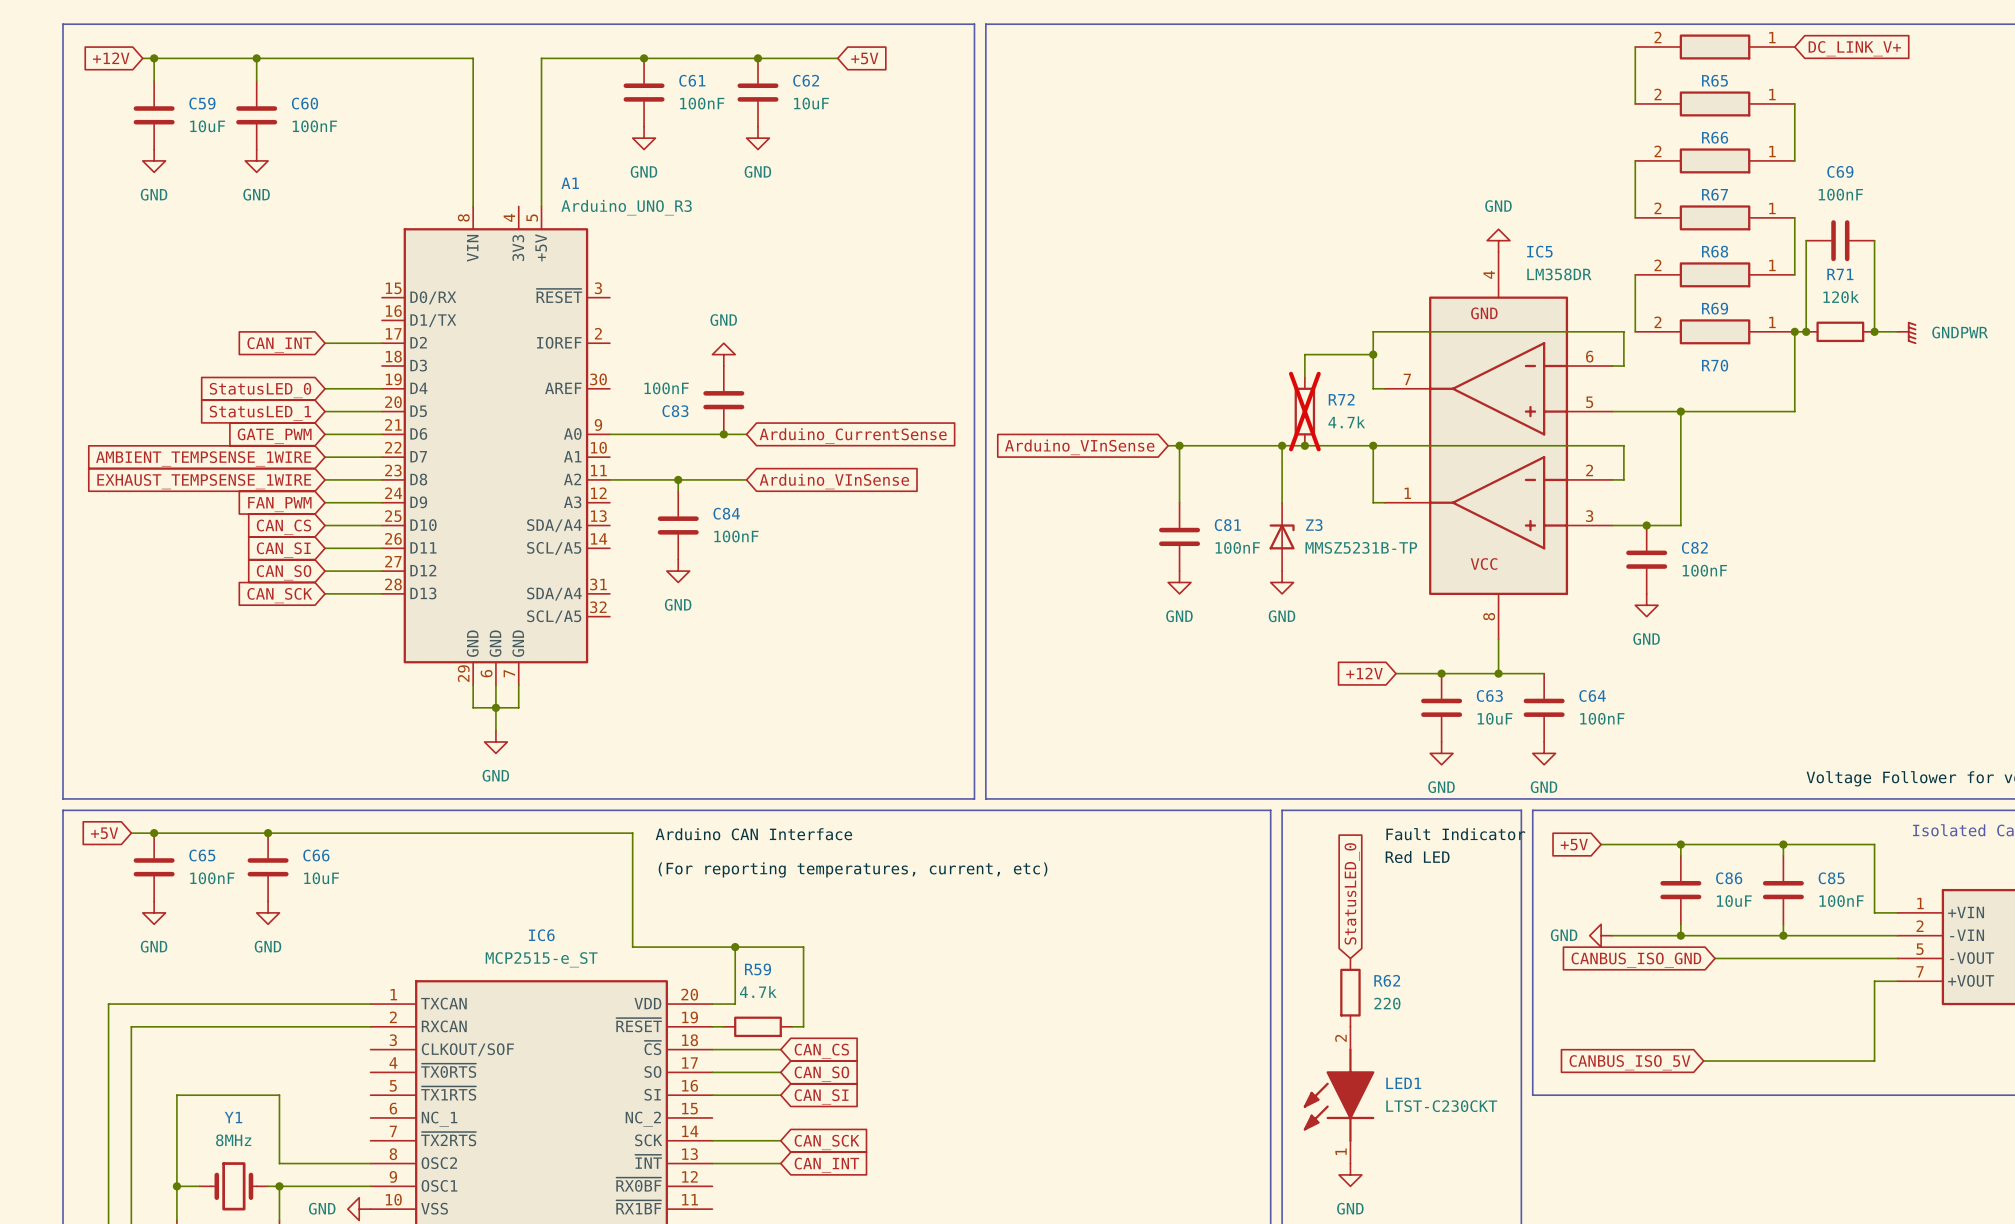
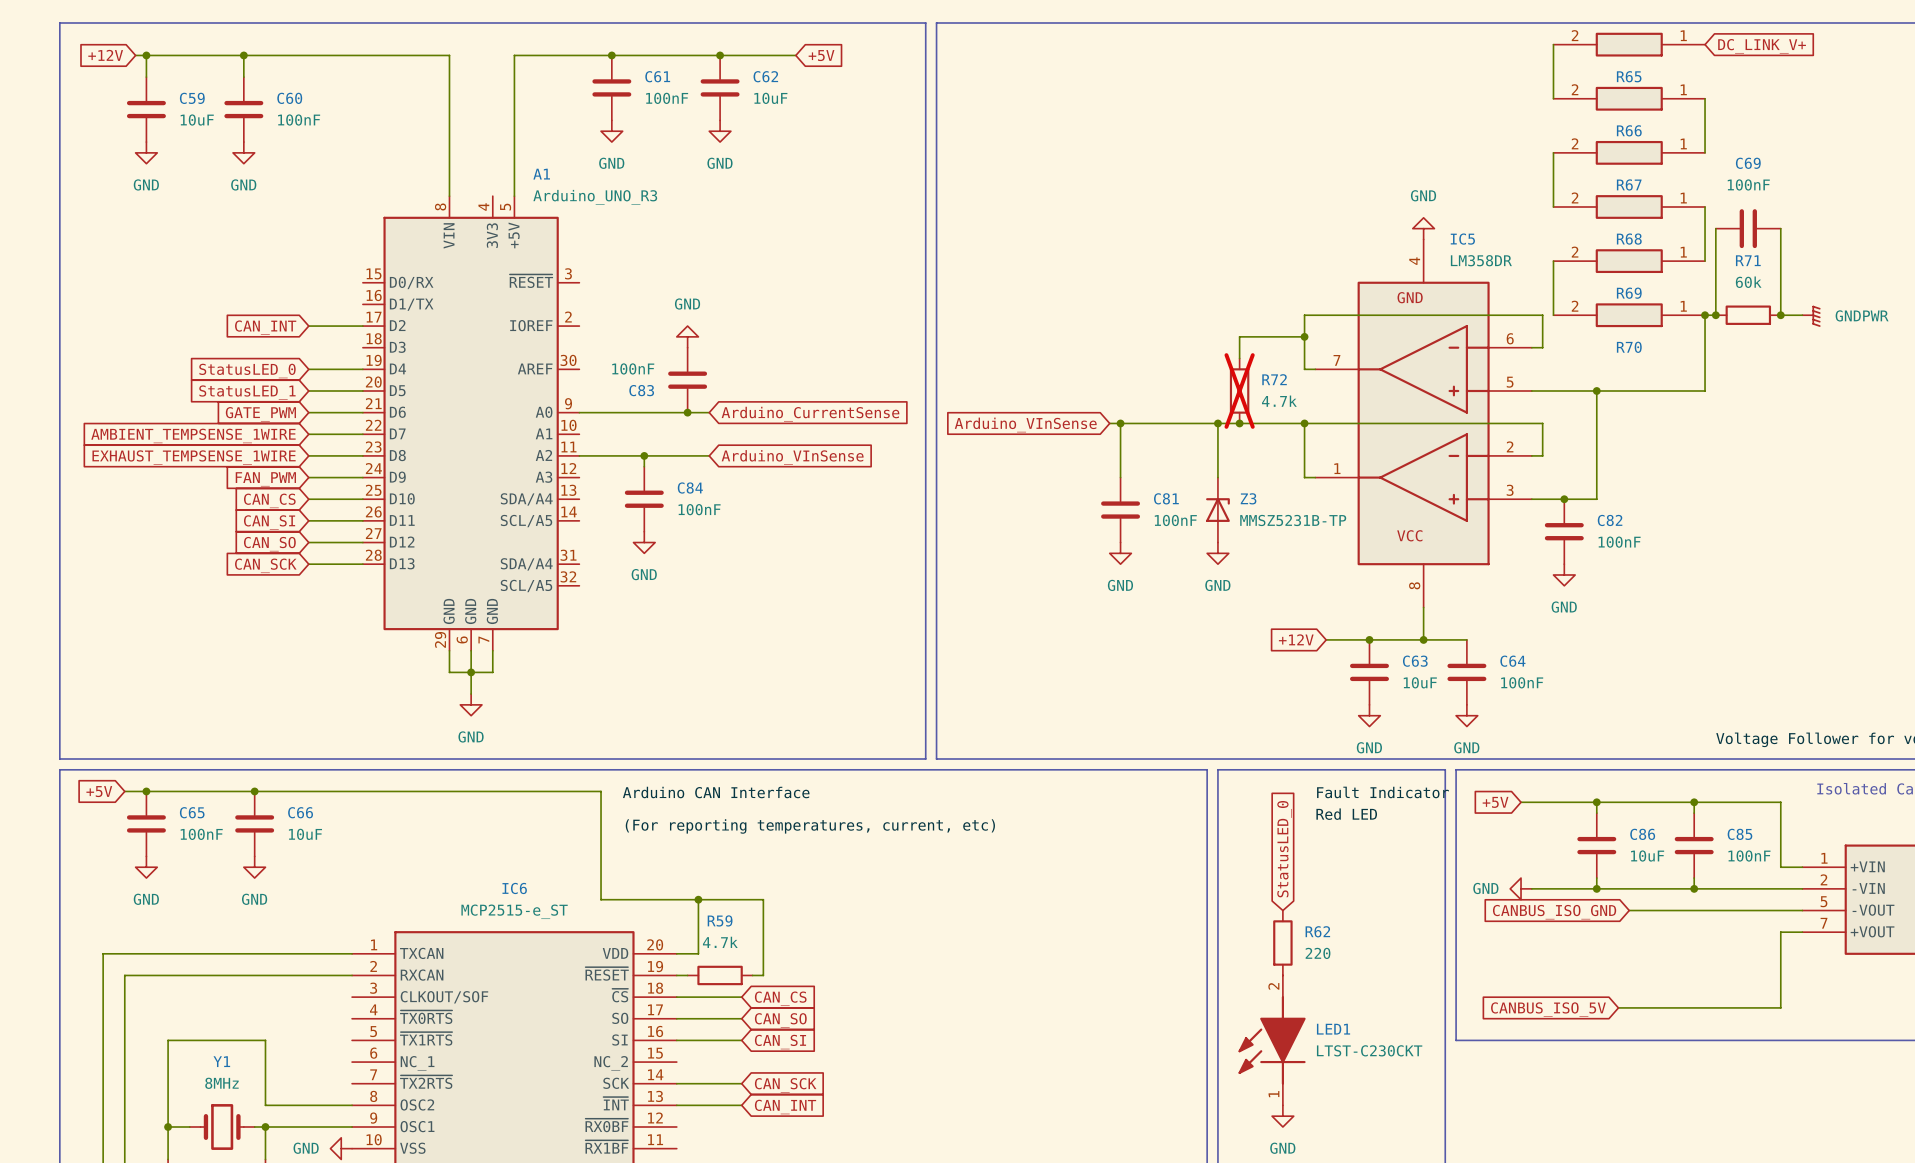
R71 value: 120k (1841, 297) -> 60k (1748, 282)

